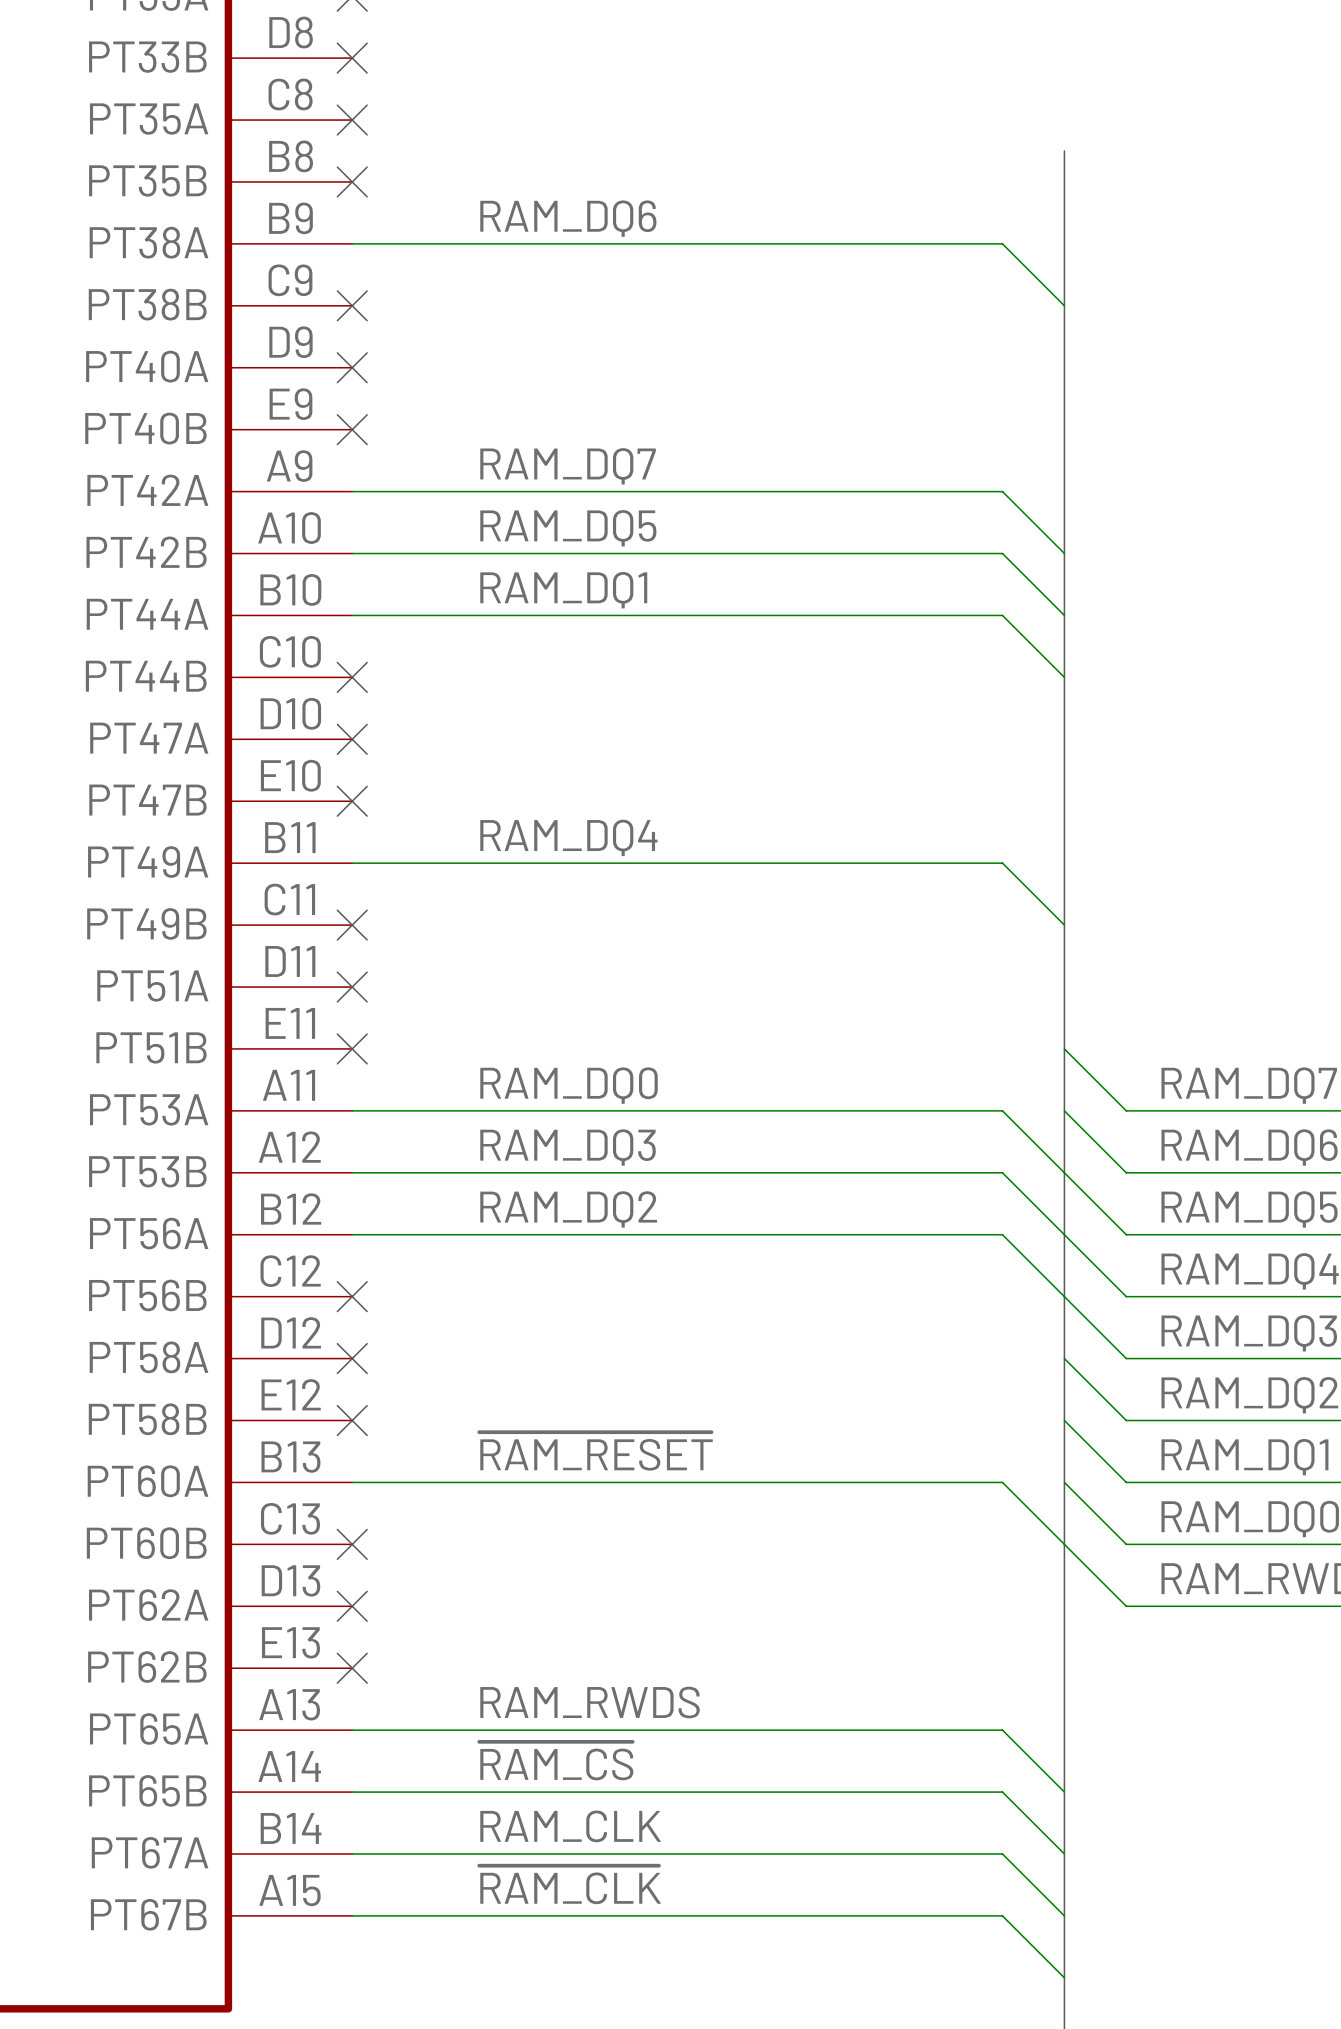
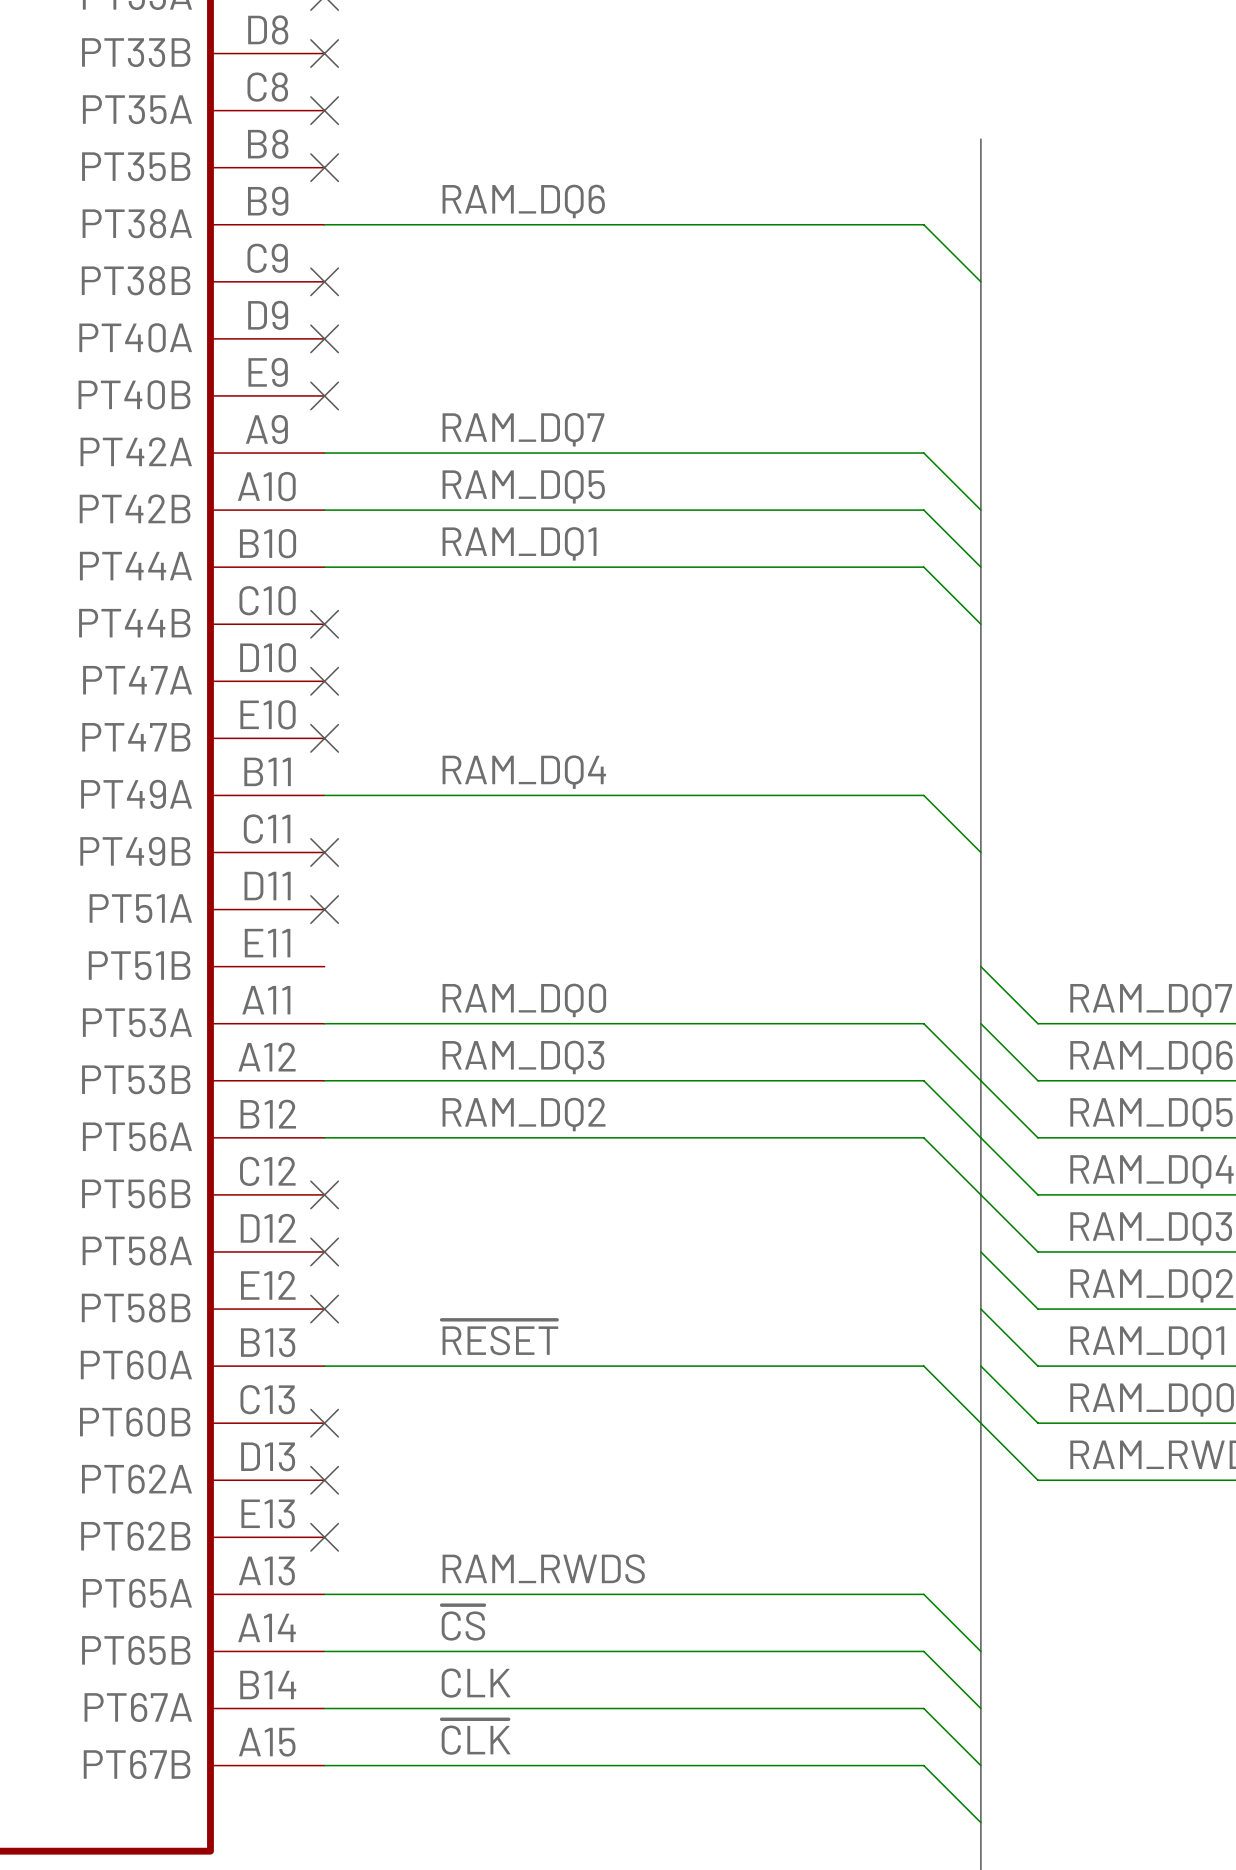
no-connect mark: (352, 1048) -> none
label: ~{RAM_RESET} (595, 1451) -> ~{RESET} (499, 1337)
label: ~{RAM_CS} (556, 1761) -> ~{CS} (463, 1622)
label: RAM_CLK (570, 1826) -> CLK (476, 1683)
label: ~{RAM_CLK} (570, 1884) -> ~{CLK} (476, 1737)

